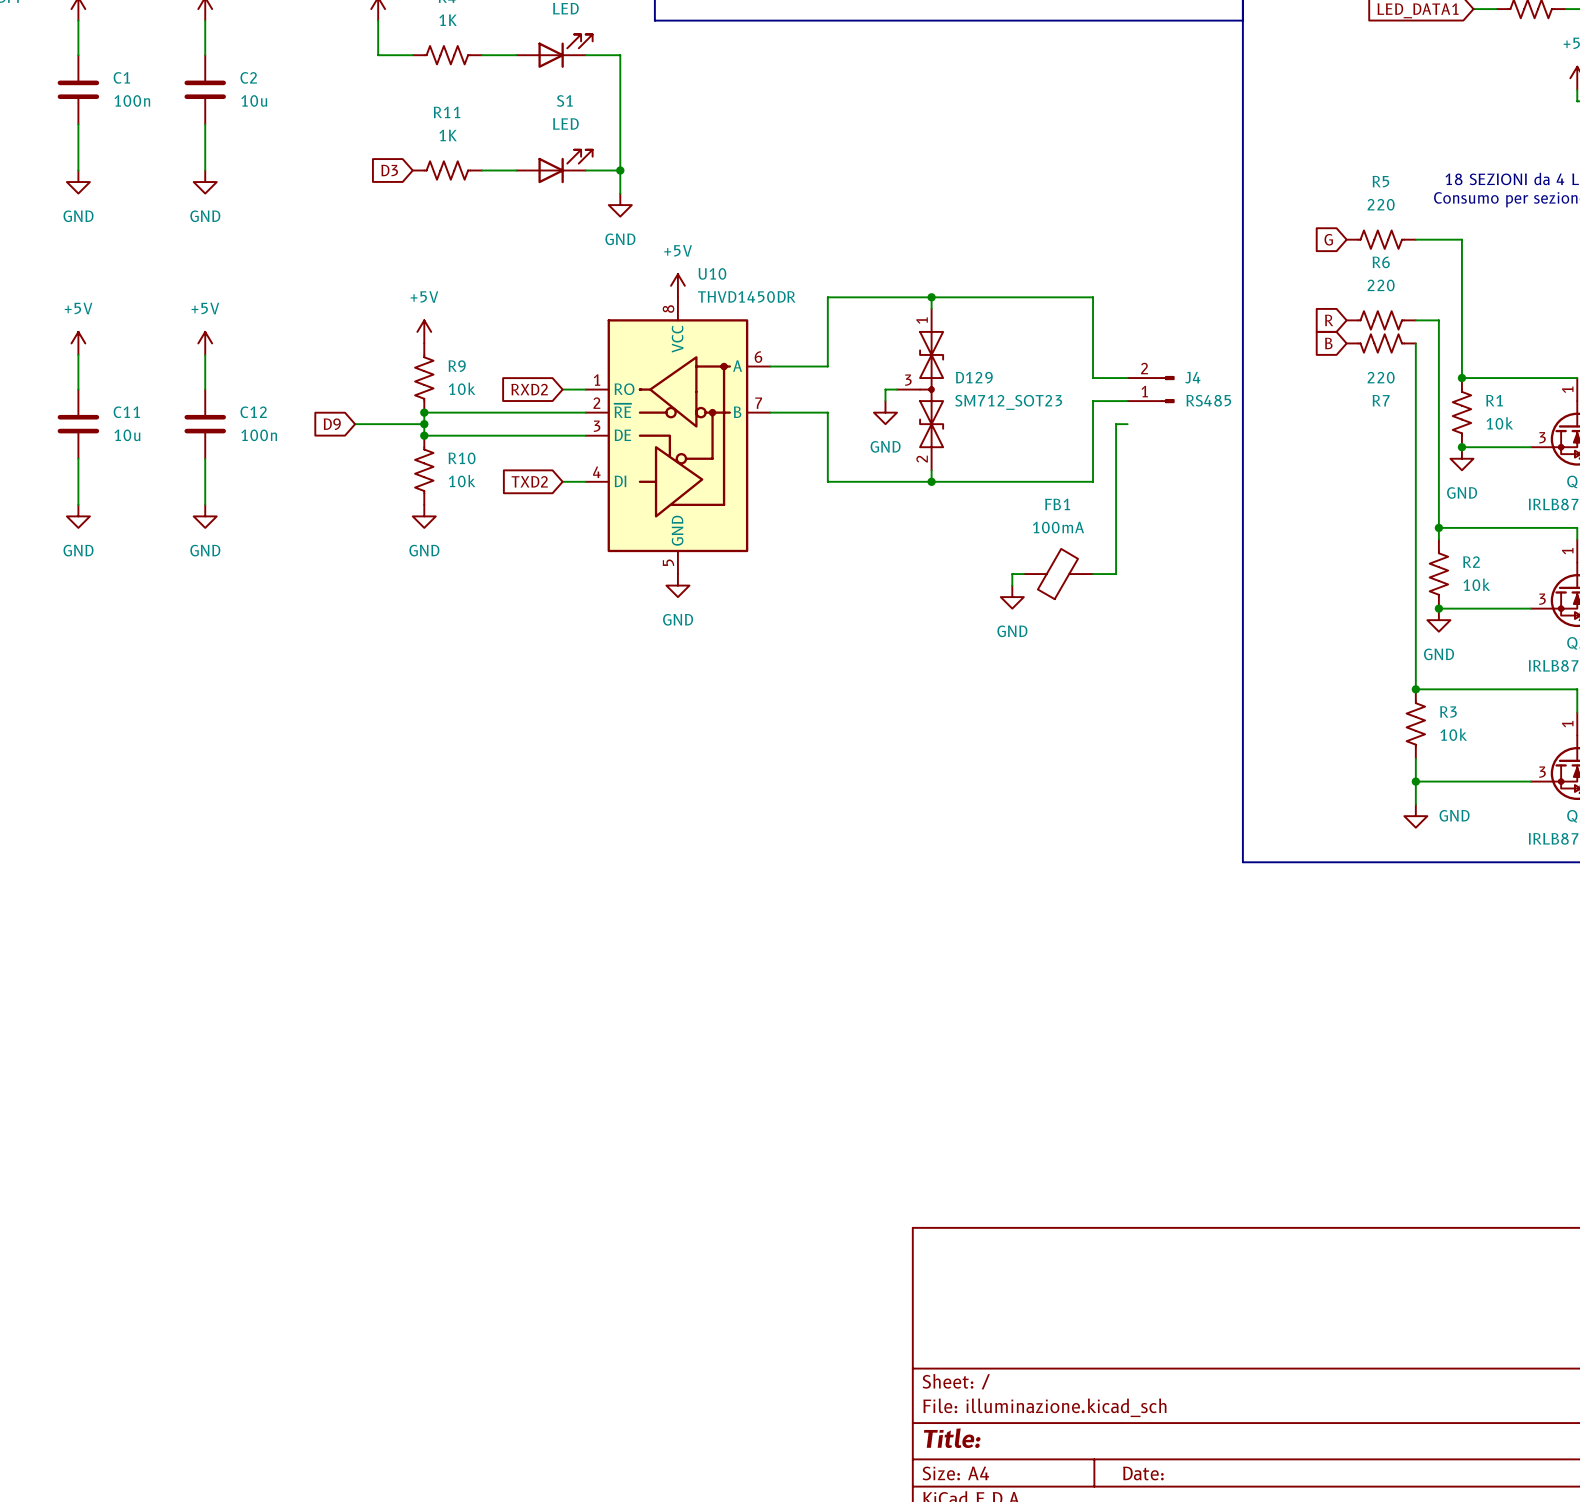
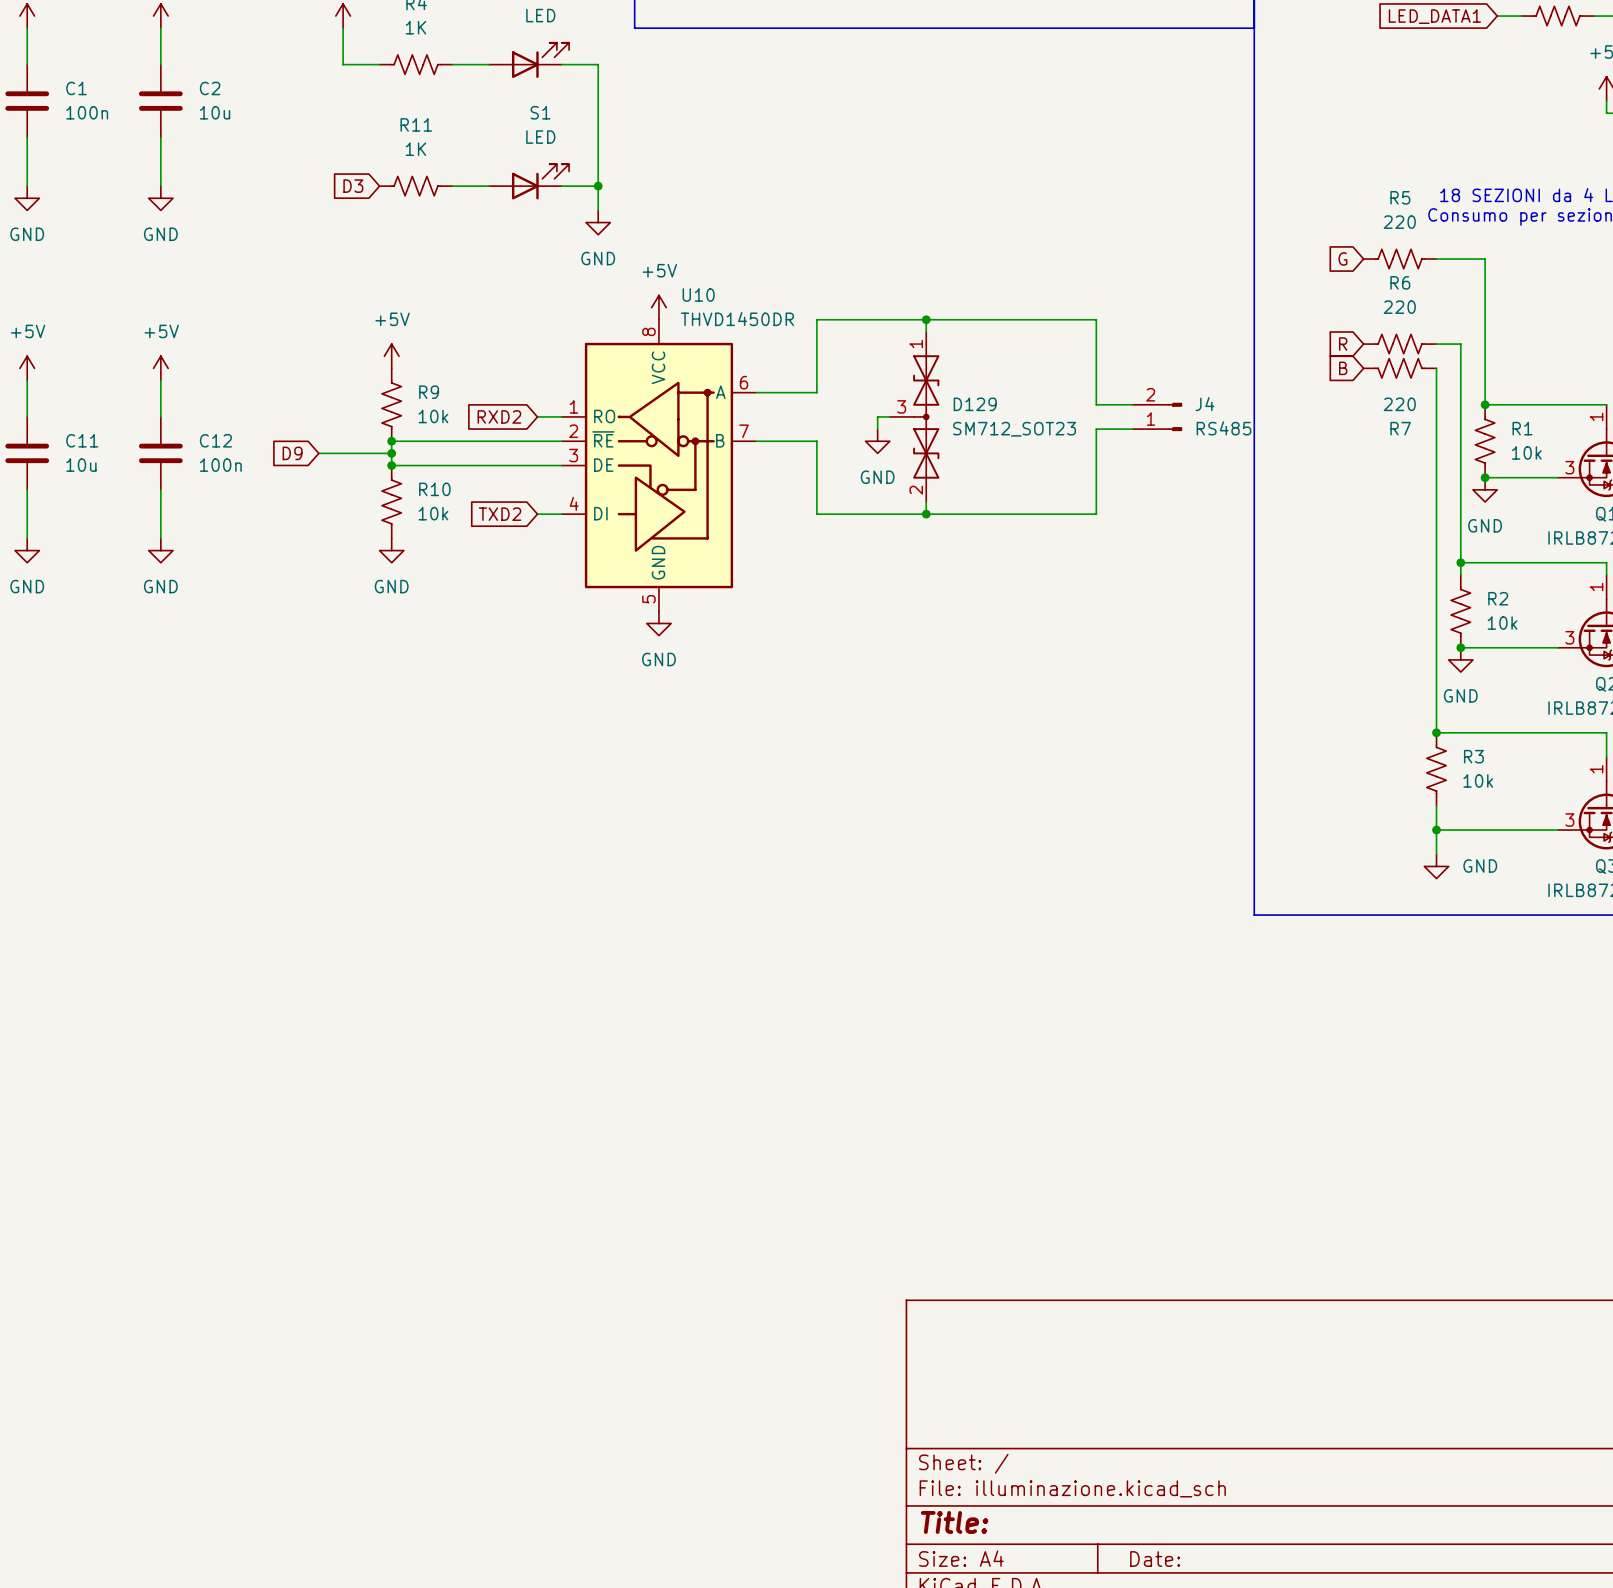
wire: (1127, 424) (1116, 424) (1116, 574) (1093, 574) -> none
wire: (1023, 574) (1012, 574) (1012, 585) -> none
FB1: 100mA (1058, 574) -> none
power symbol: GND (1012, 597) -> none

